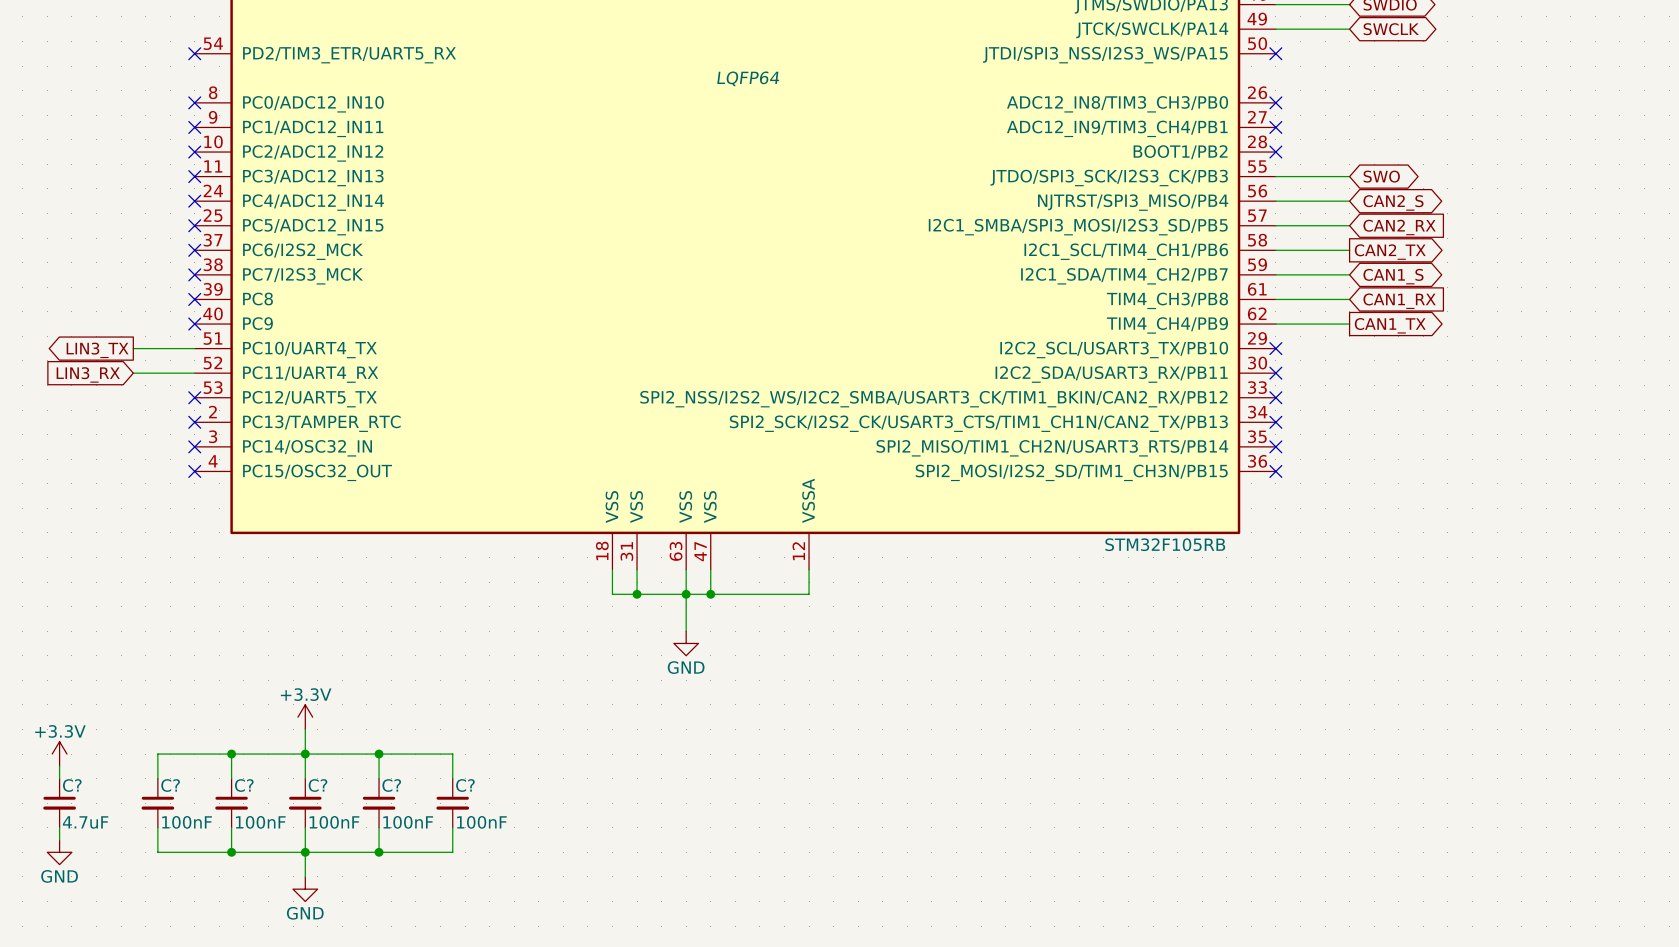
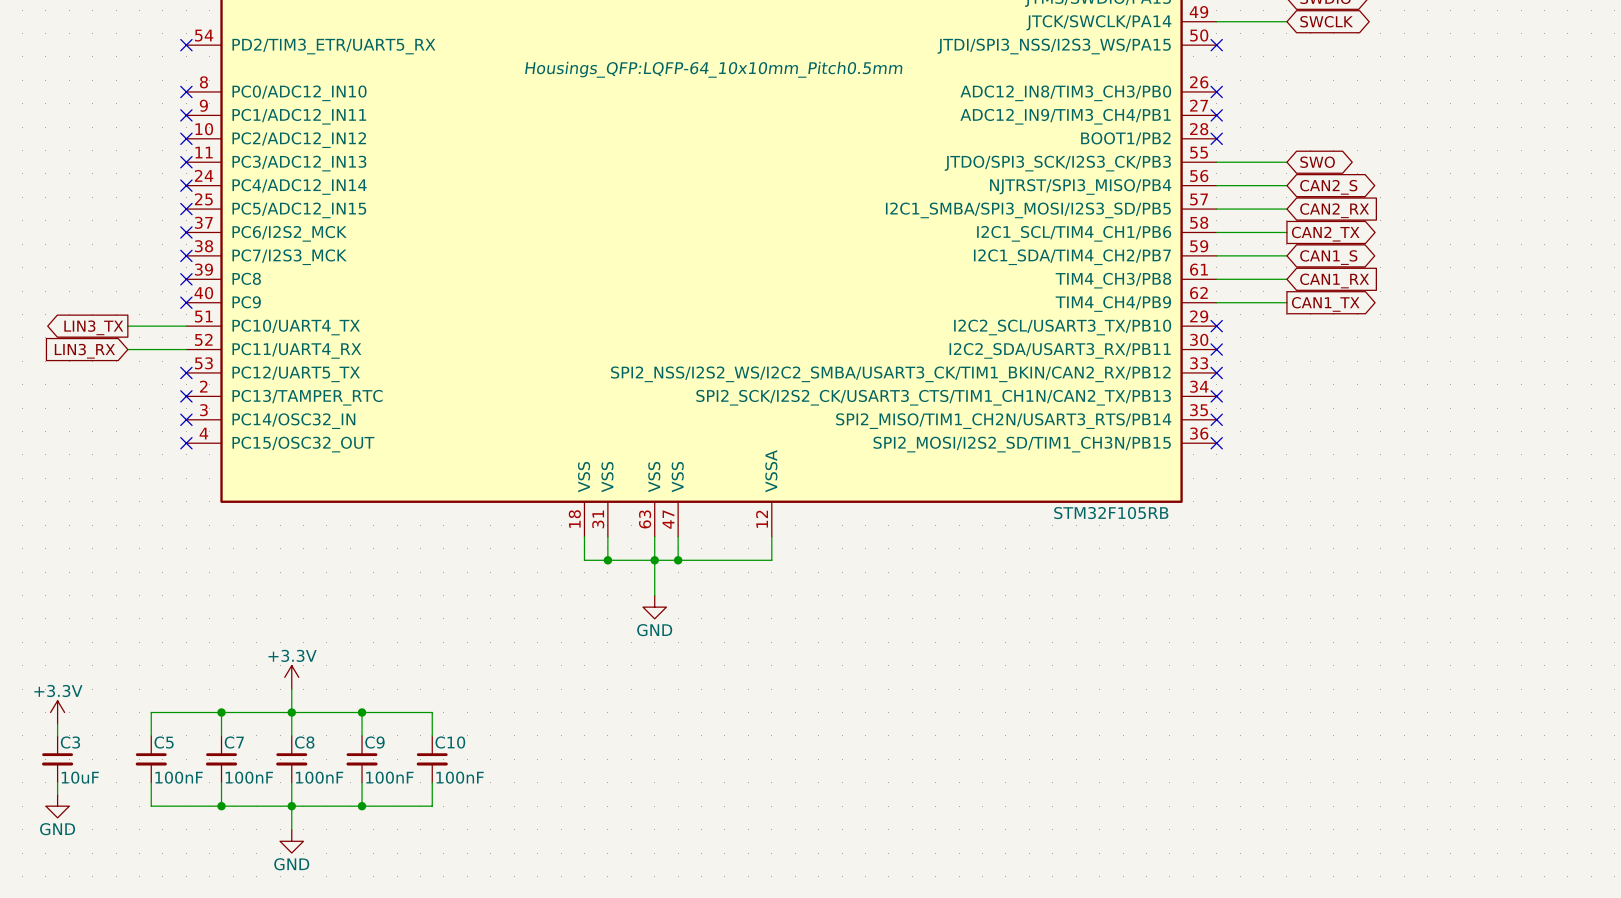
part text: LQFP64 (748, 78) -> Housings_QFP:LQFP-64_10x10mm_Pitch0.5mm (713, 69)
C? name: C? (72, 785) -> C3 (70, 742)
C? name: C? (170, 785) -> C5 (164, 742)
C? name: C? (244, 785) -> C7 (234, 742)
C? name: C? (318, 785) -> C8 (304, 742)
C? name: C? (391, 785) -> C9 (374, 742)
C? name: C? (465, 785) -> C10 (450, 742)
C? value: 4.7uF (85, 822) -> 10uF (80, 777)

